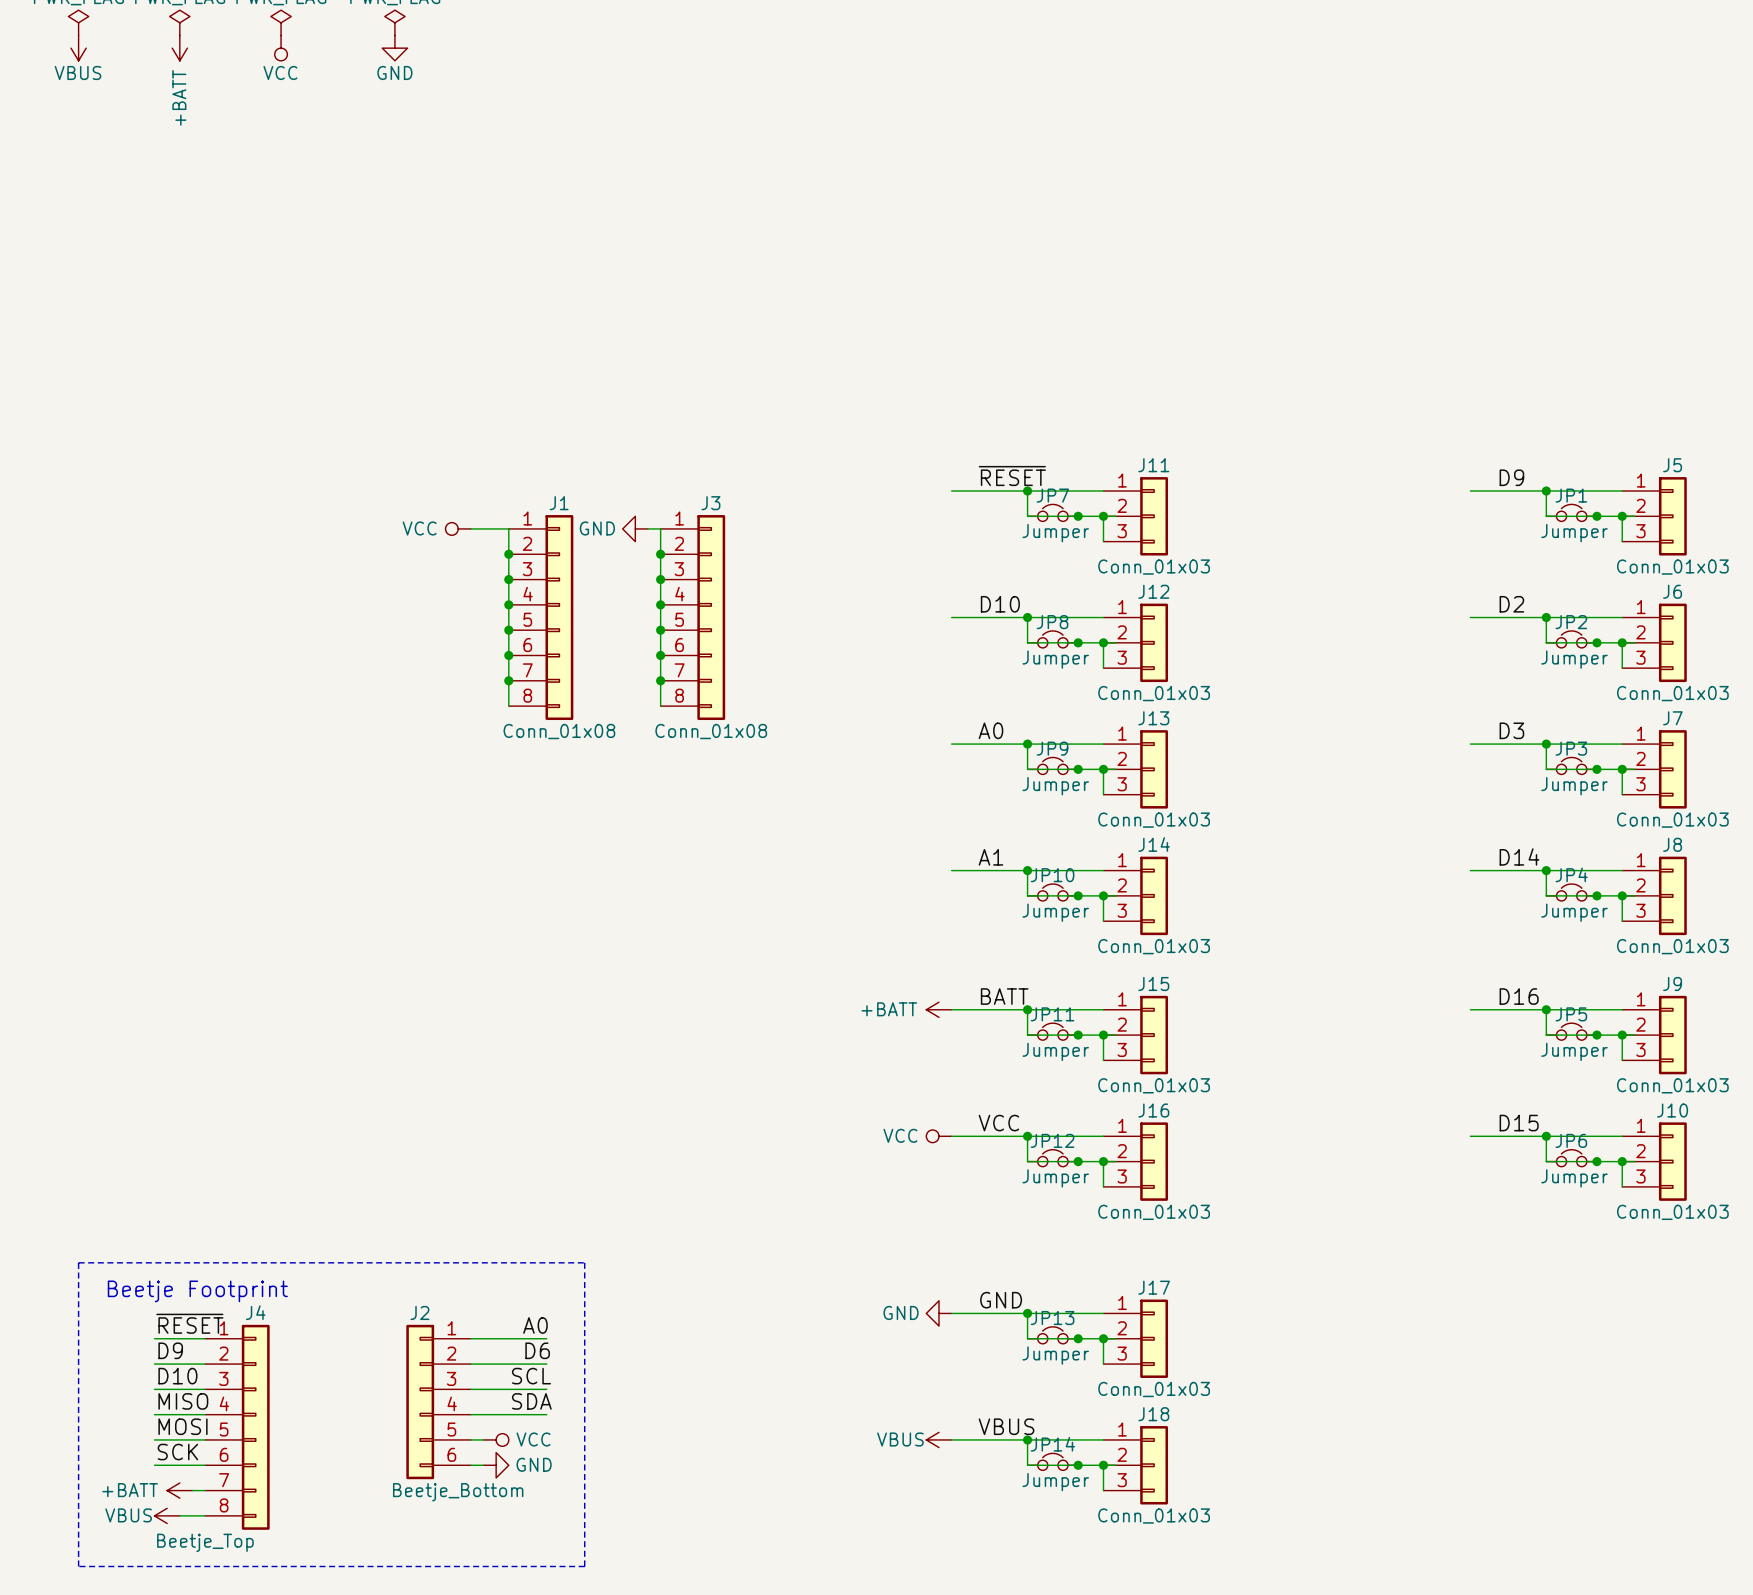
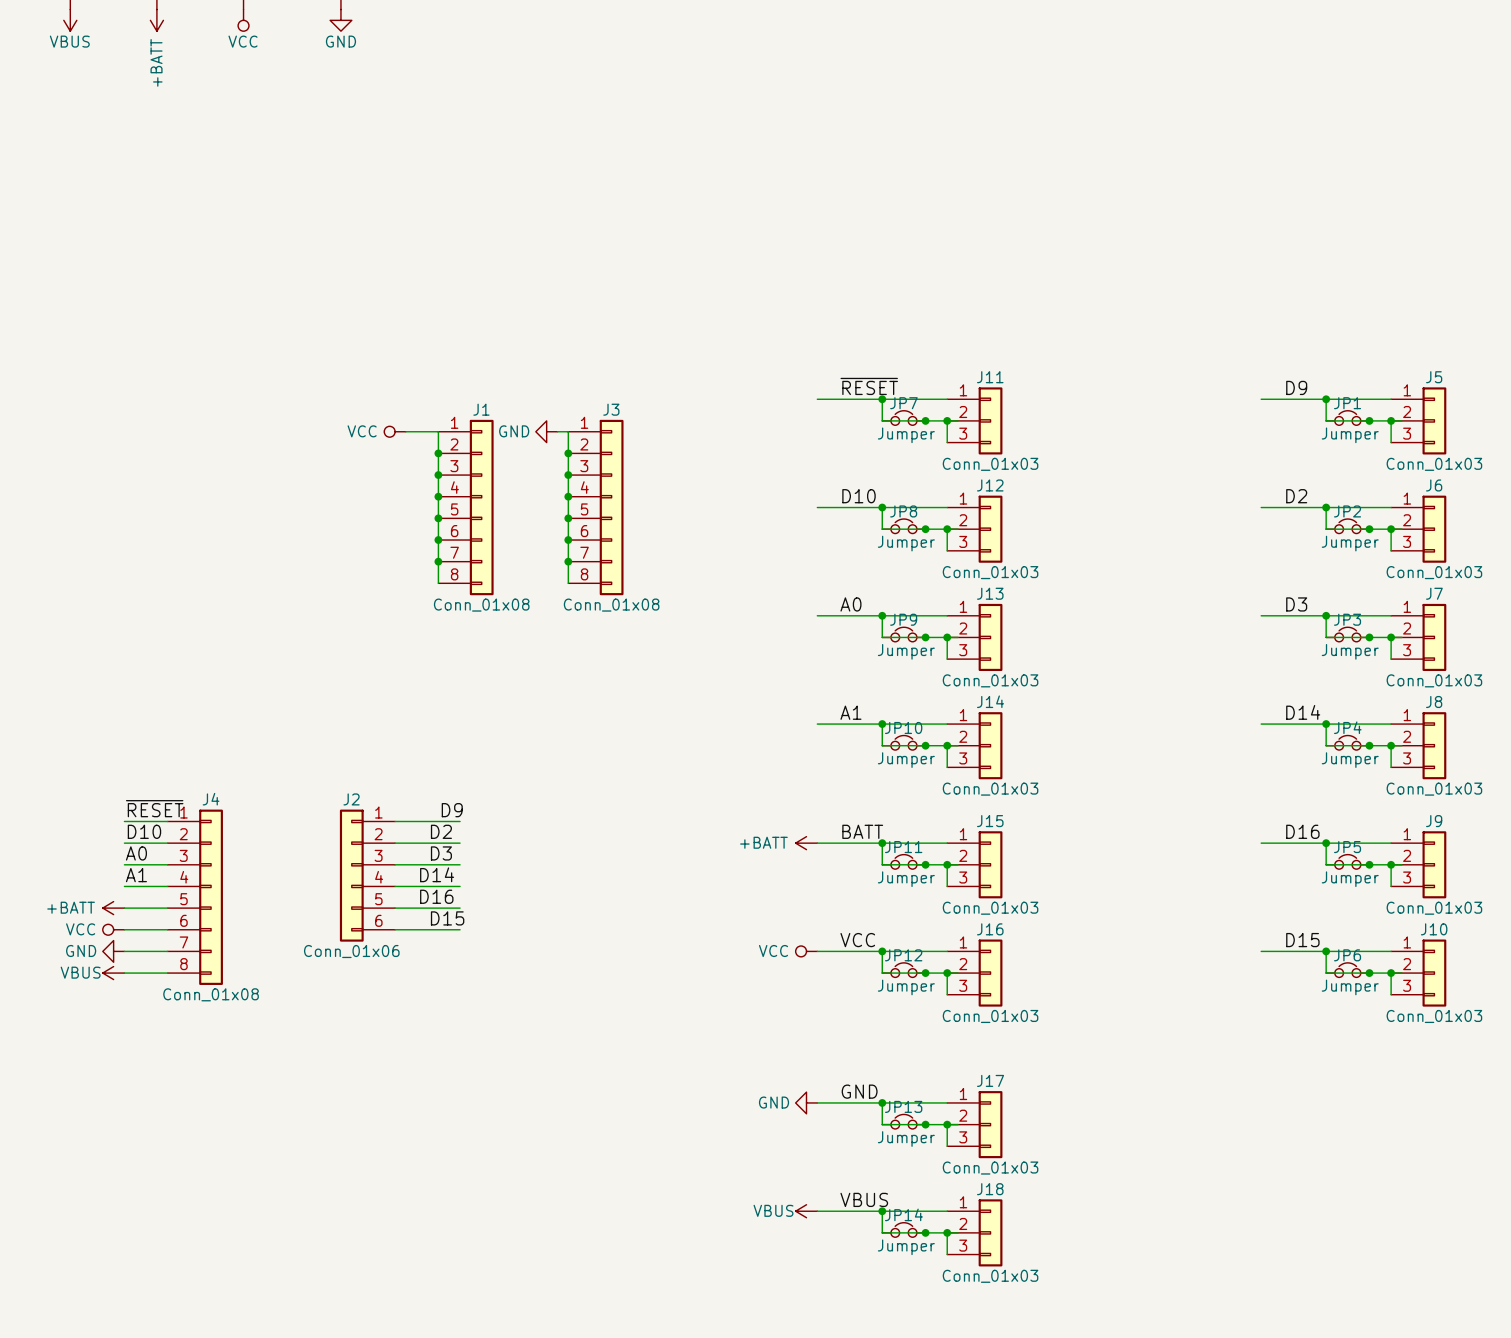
label: none -> ~{RESET} (154, 808)
label: none -> D9 (452, 810)
wire: none -> (124, 821) (167, 821)
wire: none -> (395, 821) (460, 821)
label: none -> D10 (144, 831)
label: none -> D2 (441, 831)
wire: none -> (124, 843) (167, 843)
wire: none -> (395, 843) (460, 843)
label: none -> A0 (136, 853)
label: none -> D3 (441, 853)
wire: none -> (124, 864) (167, 864)
wire: none -> (395, 864) (460, 864)
label: none -> D14 (437, 874)
label: none -> A1 (136, 875)
wire: none -> (124, 886) (167, 886)
wire: none -> (395, 886) (460, 886)
label: none -> D16 (436, 896)
power symbol: none -> +BATT (113, 908)
wire: none -> (124, 908) (167, 908)
wire: none -> (395, 908) (460, 908)
label: none -> D15 (447, 918)
power symbol: none -> VCC (113, 929)
power symbol: none -> GND (113, 951)
power symbol: none -> VBUS (113, 973)
line: (78, 1262) (584, 1262) (584, 1566) (78, 1566) (78, 1262) -> none
text: Beetje Footprint (197, 1291) -> none
label: ~{RESET} (189, 1323) -> none
label: A0 (535, 1325) -> none
wire: (154, 1338) (205, 1338) -> (124, 929) (167, 929)
wire: (470, 1338) (546, 1338) -> (395, 929) (460, 929)
label: D9 (170, 1350) -> none
label: D6 (537, 1350) -> none
wire: (154, 1364) (205, 1364) -> (124, 951) (167, 951)
wire: (470, 1364) (546, 1364) -> none
label: D10 (177, 1376) -> none
label: SCL (531, 1376) -> none
wire: (154, 1389) (205, 1389) -> (124, 973) (167, 973)
wire: (470, 1389) (546, 1389) -> none
label: MISO (183, 1401) -> none
label: SDA (531, 1401) -> none
J2 position: (438, 1402) -> (367, 875)
wire: (154, 1414) (205, 1414) -> none
wire: (470, 1414) (546, 1414) -> none
label: MOSI (182, 1426) -> none
J4 position: (237, 1427) -> (195, 897)
wire: (154, 1439) (205, 1439) -> none
wire: (470, 1439) (483, 1439) -> none
power symbol: VCC (496, 1439) -> none
label: SCK (177, 1452) -> none
wire: (154, 1465) (205, 1465) -> none
wire: (470, 1465) (483, 1465) -> none
power symbol: GND (496, 1465) -> none
power symbol: +BATT (179, 1490) -> none
wire: (192, 1490) (205, 1490) -> none
J2 value: Beetje_Bottom (458, 1492) -> Conn_01x06 (351, 951)
power symbol: VBUS (167, 1515) -> none
wire: (179, 1515) (205, 1515) -> none
J4 value: Beetje_Top (205, 1542) -> Conn_01x08 (211, 994)

